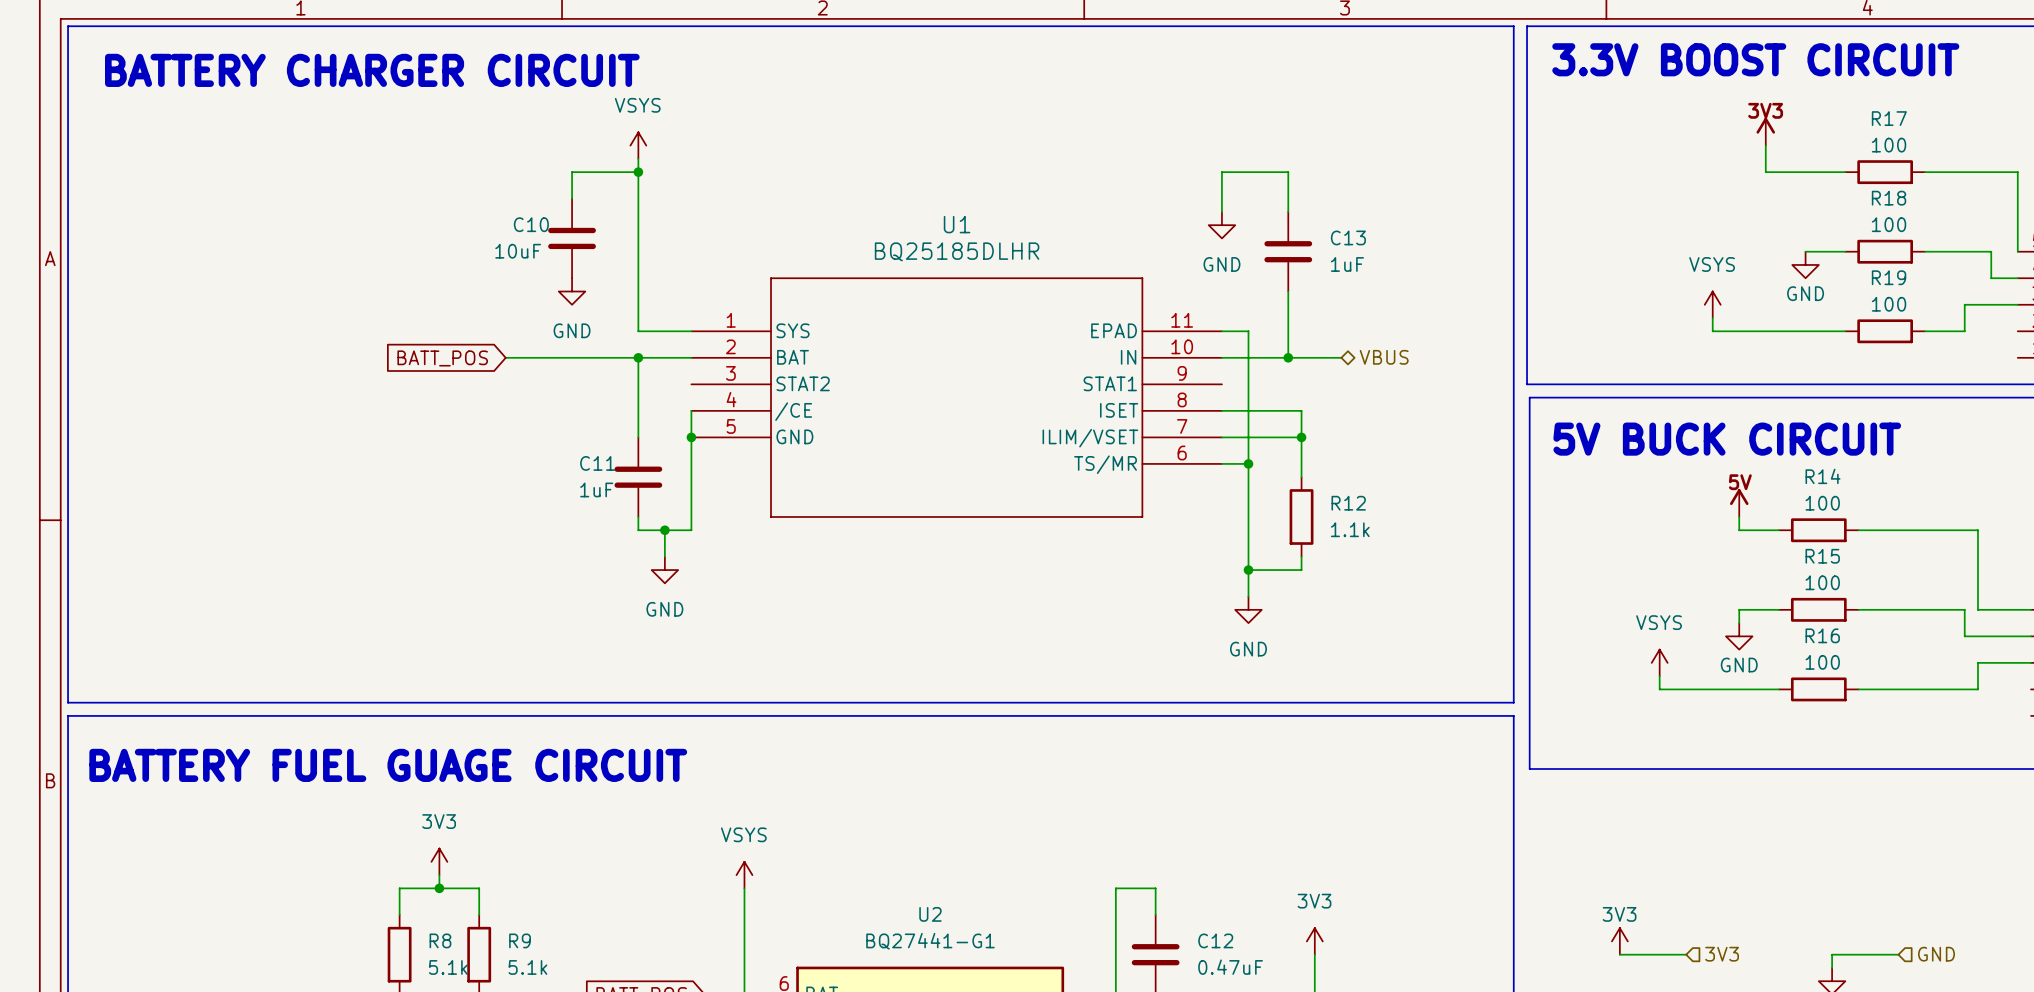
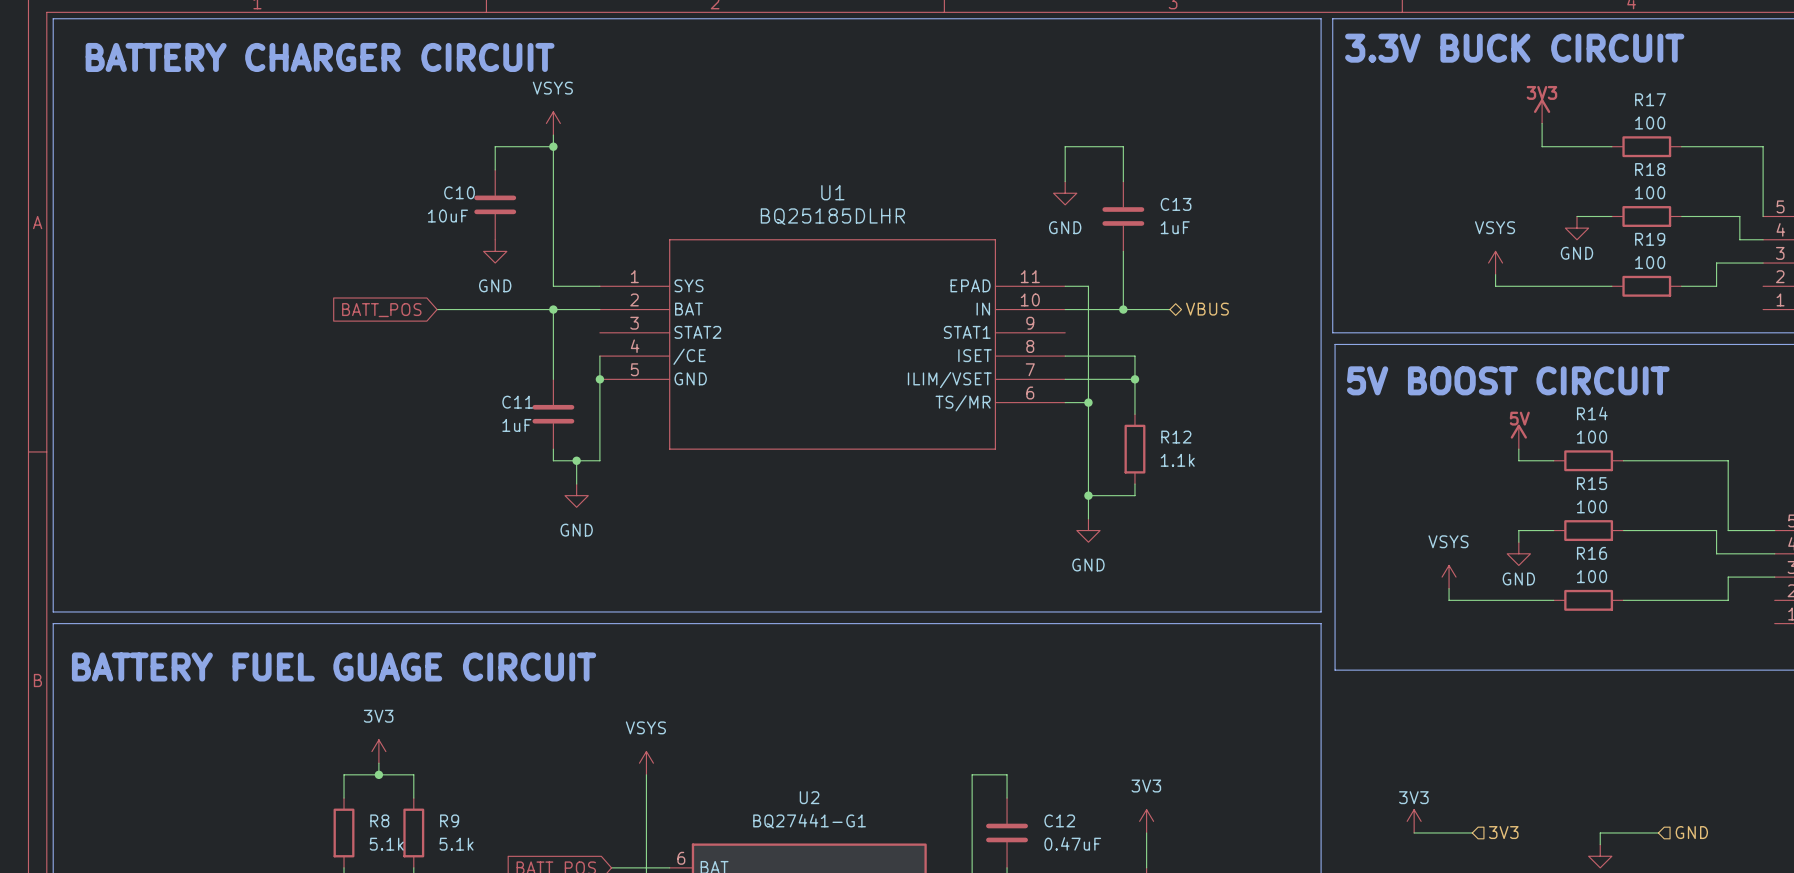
text: 3.3V BOOST CIRCUIT (1755, 59) -> 3.3V BUCK CIRCUIT (1514, 48)
text: 5V BUCK CIRCUIT (1727, 439) -> 5V BOOST CIRCUIT (1508, 380)

